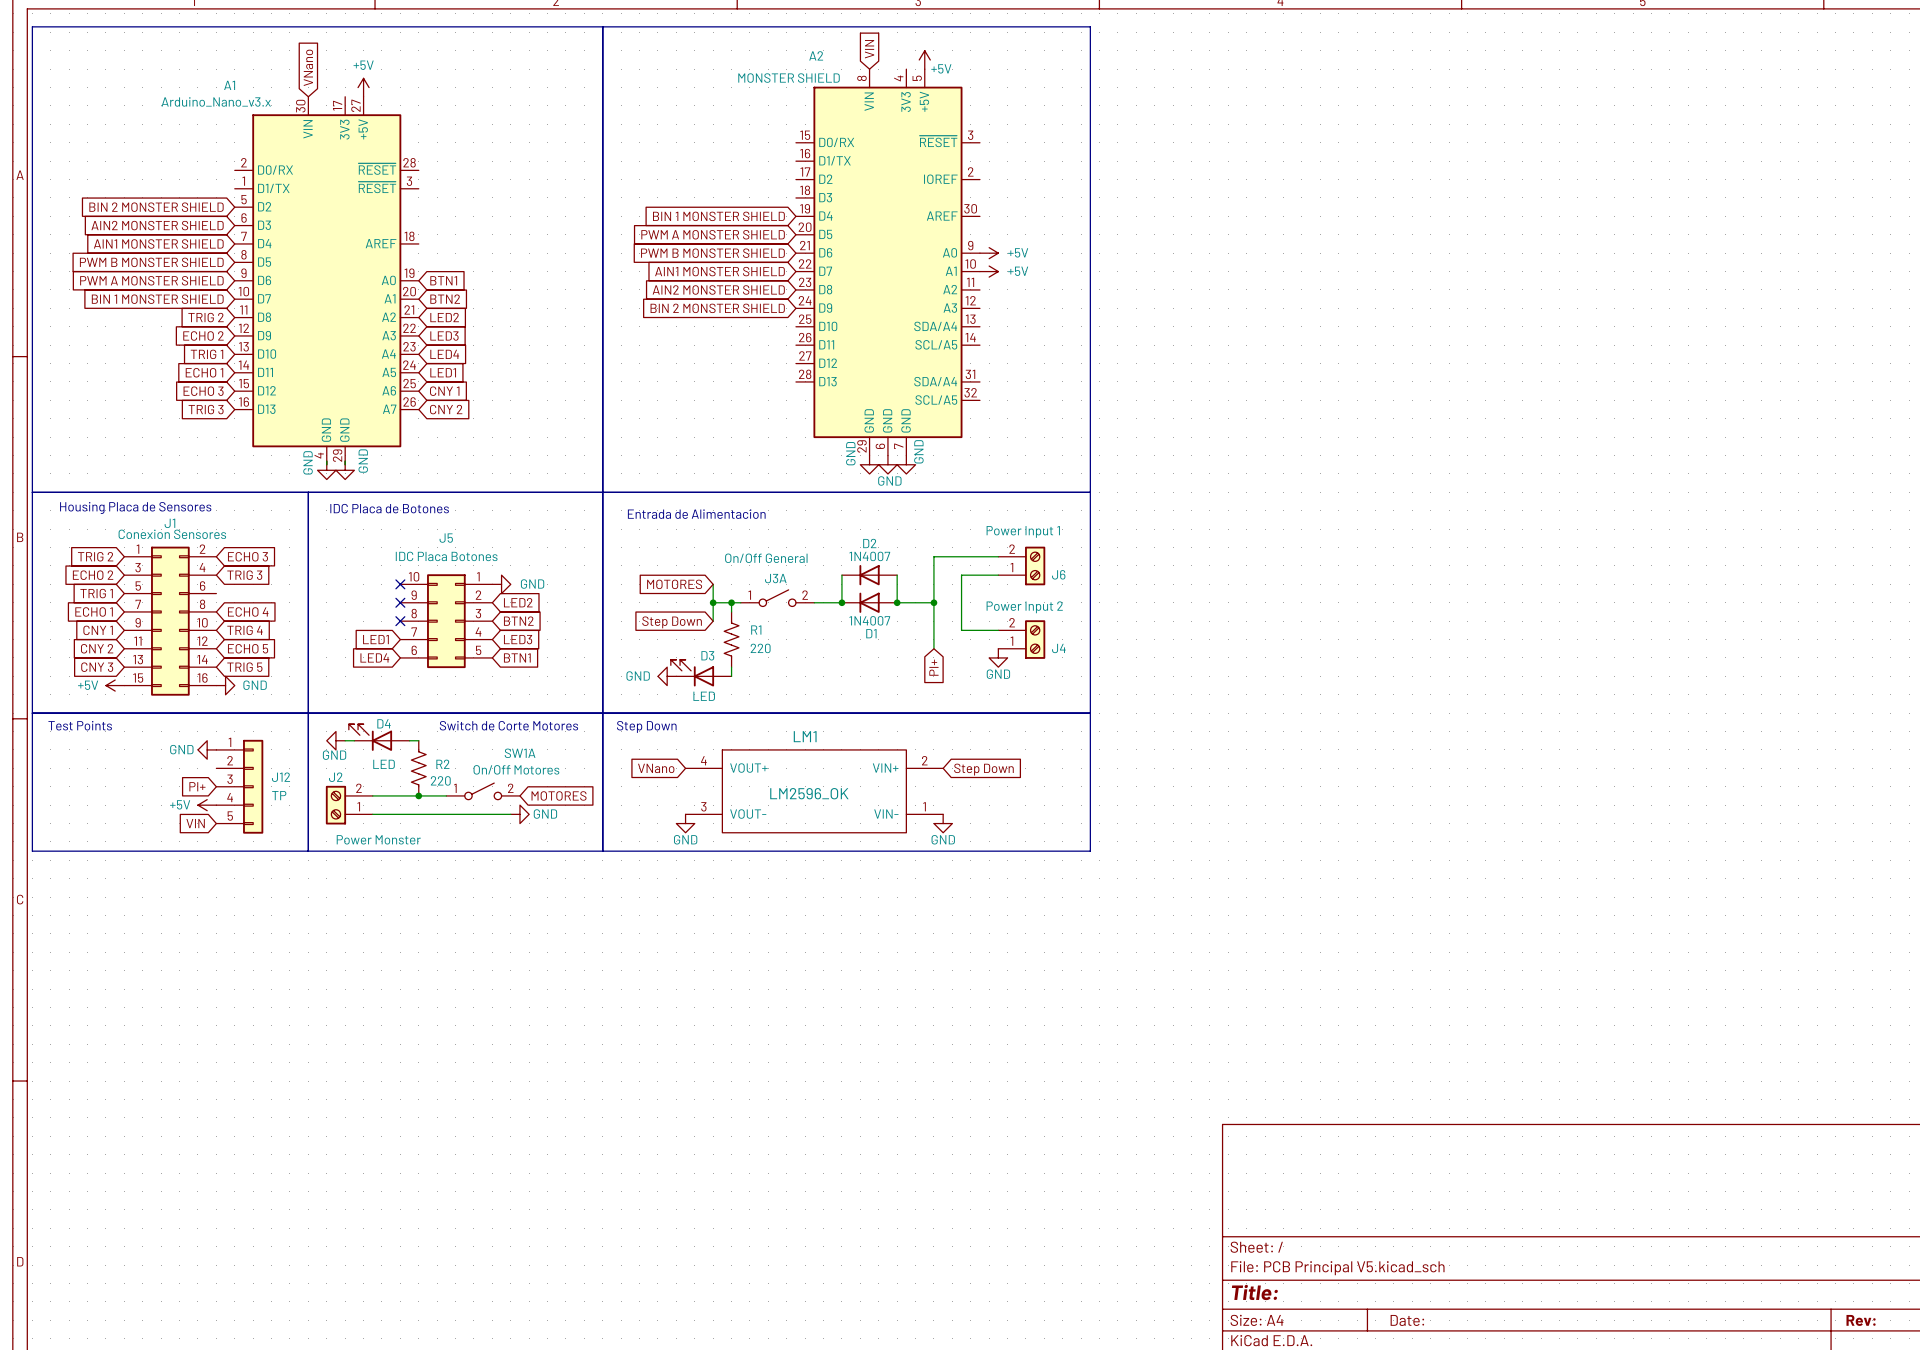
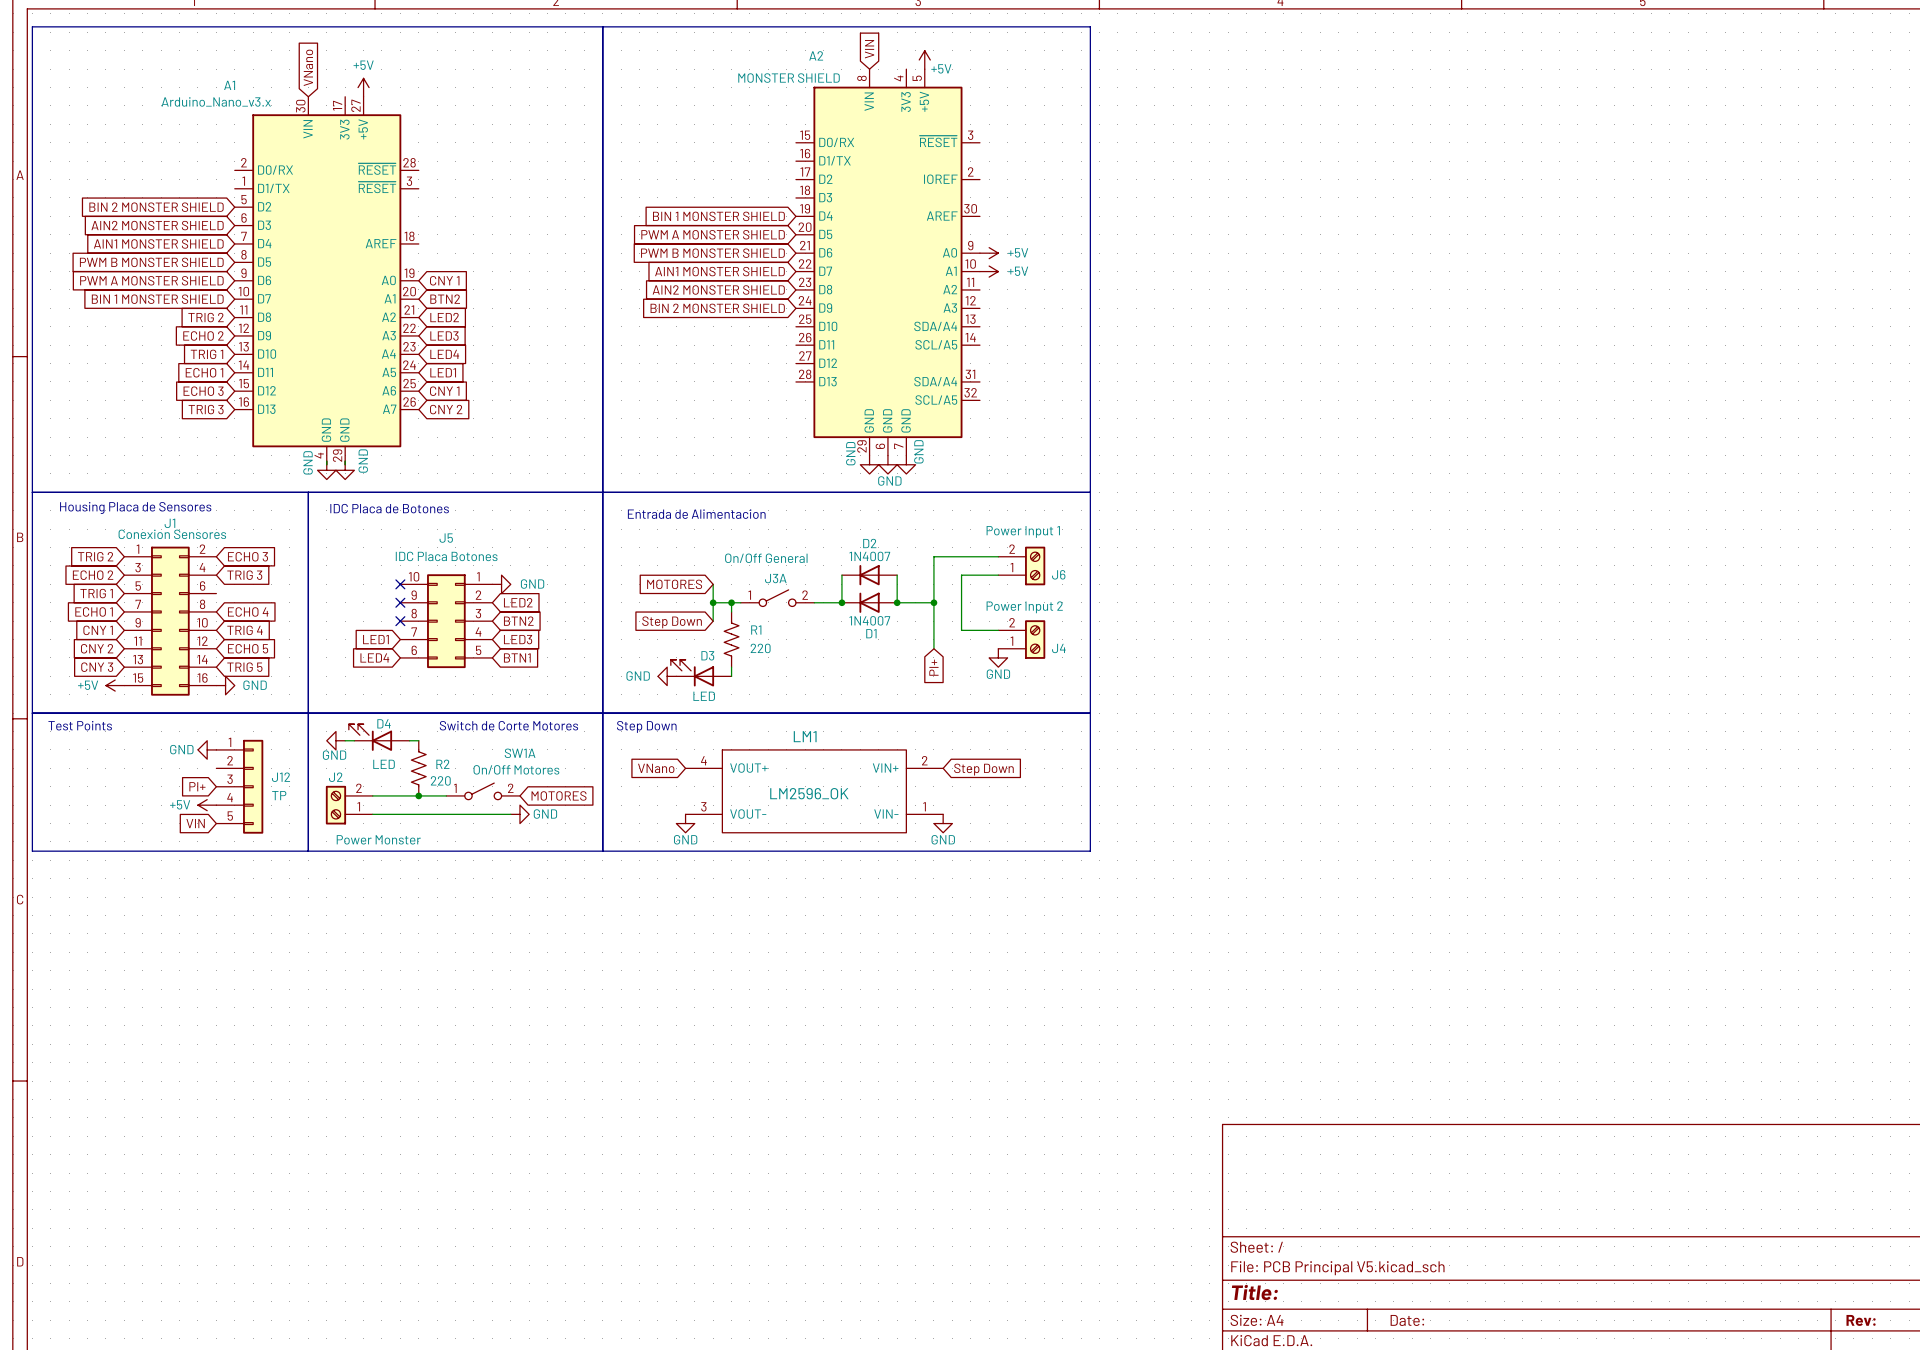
global label: BTN1 (443, 280) -> CNY 1 (444, 280)

